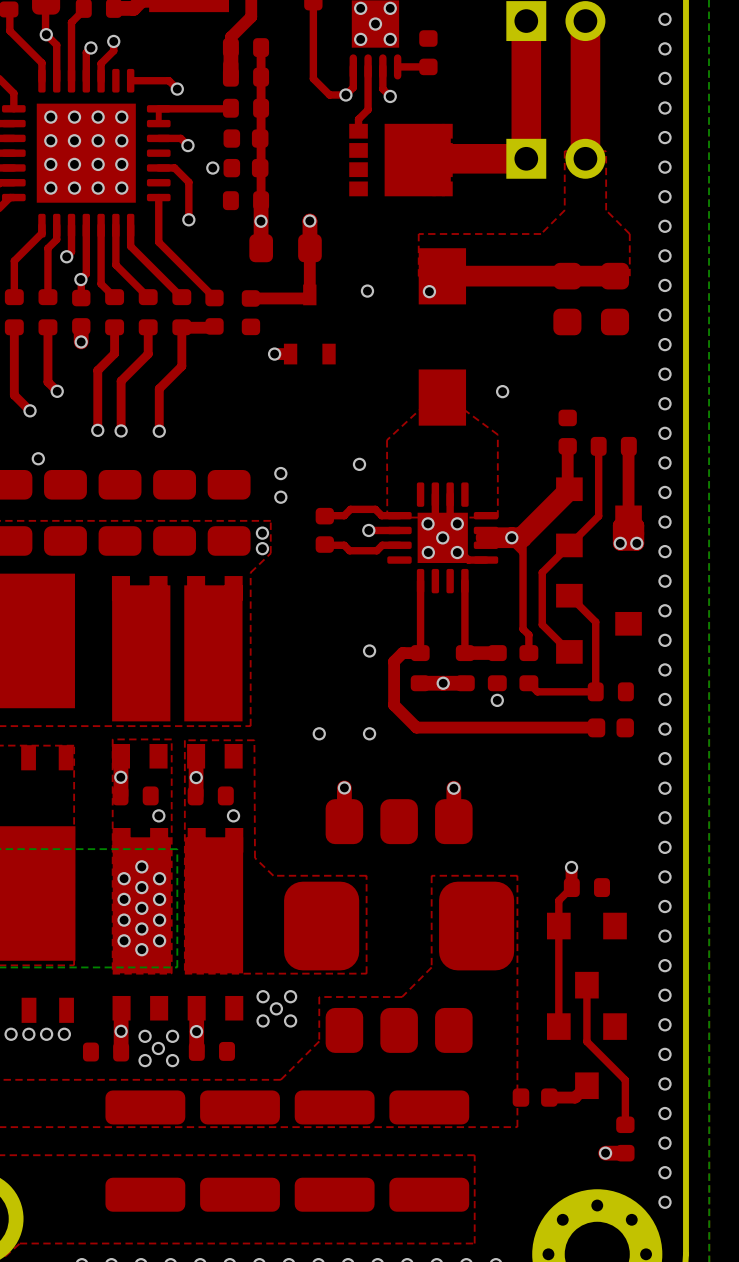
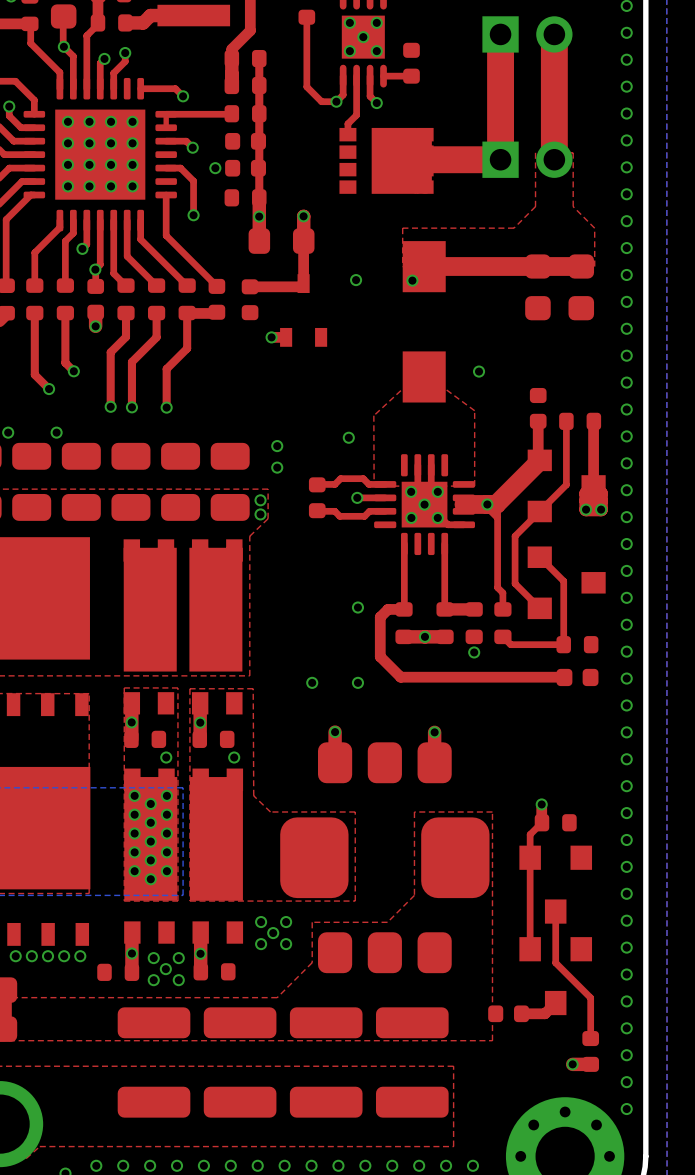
via: none -> (134, 795)
via: none -> (166, 795)

